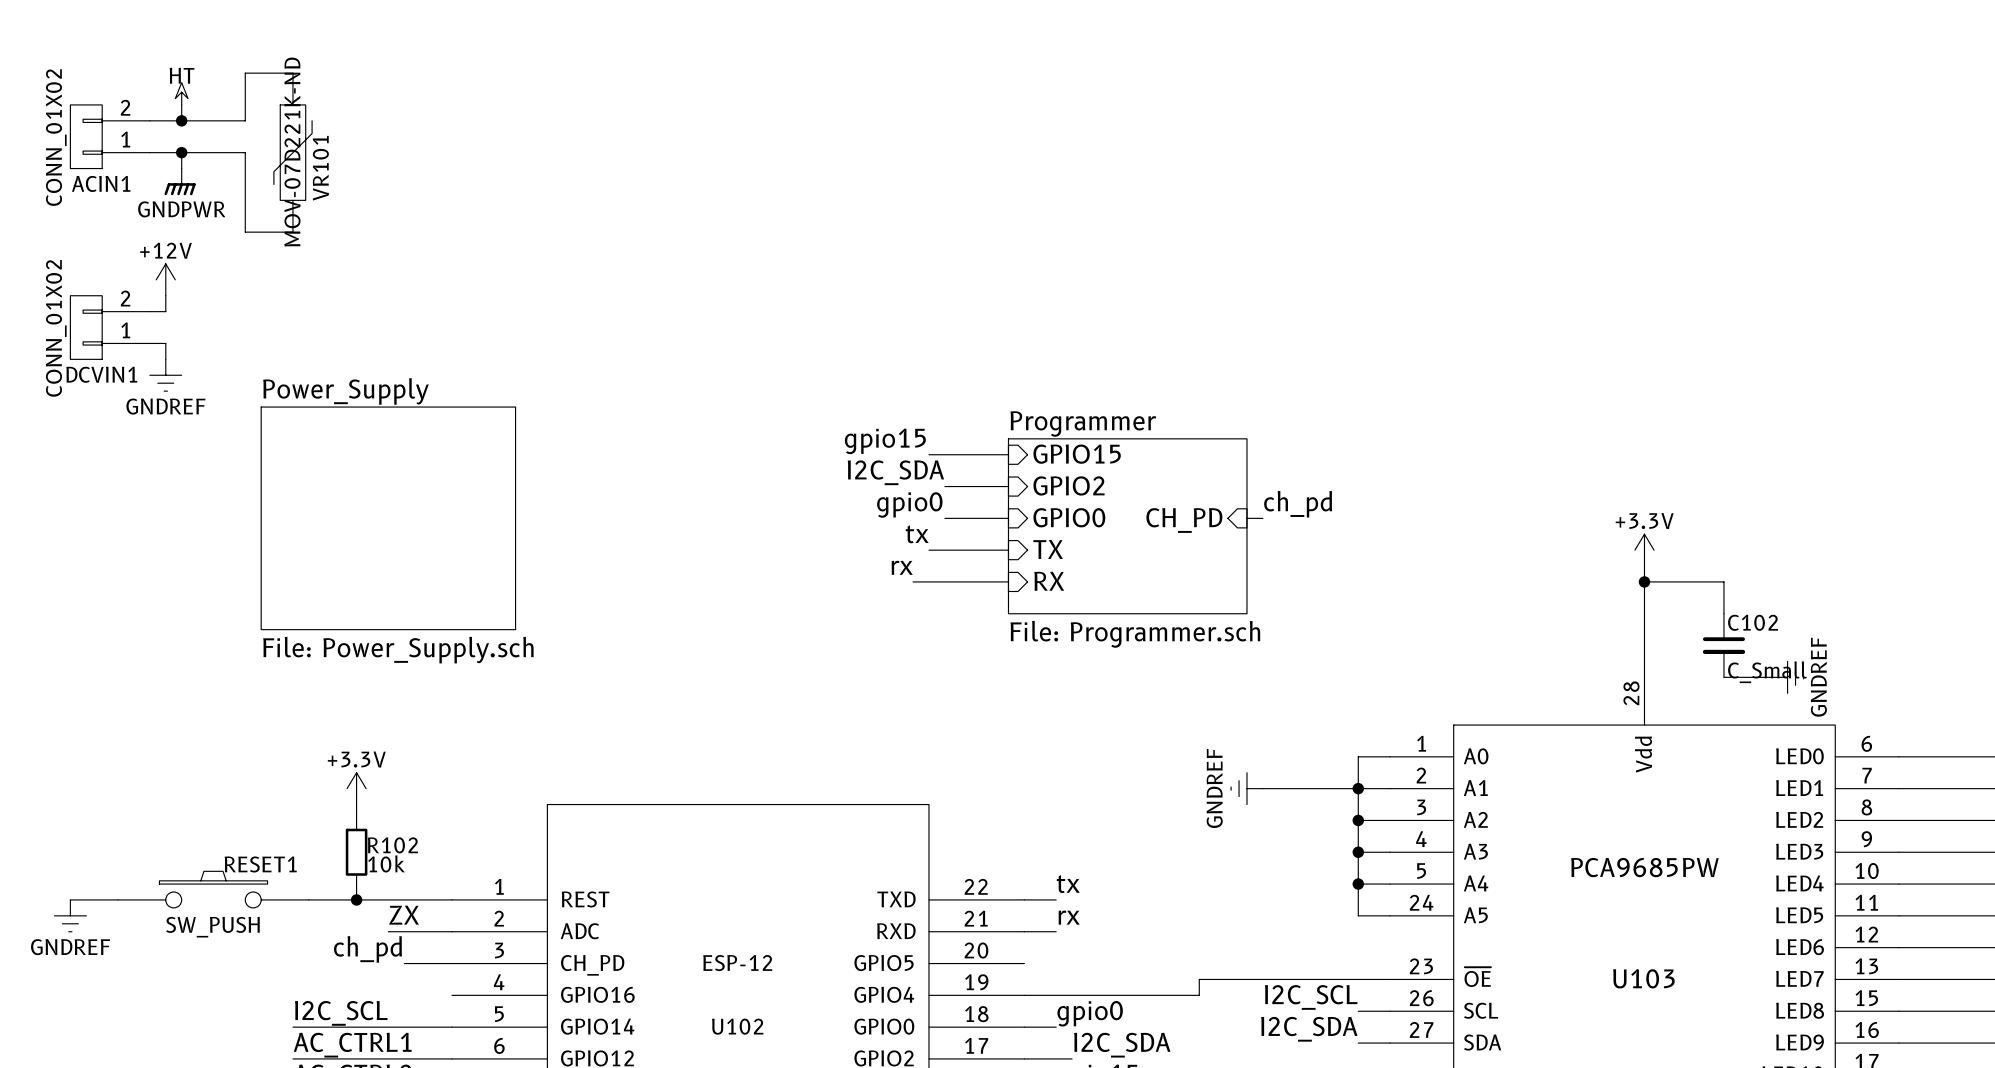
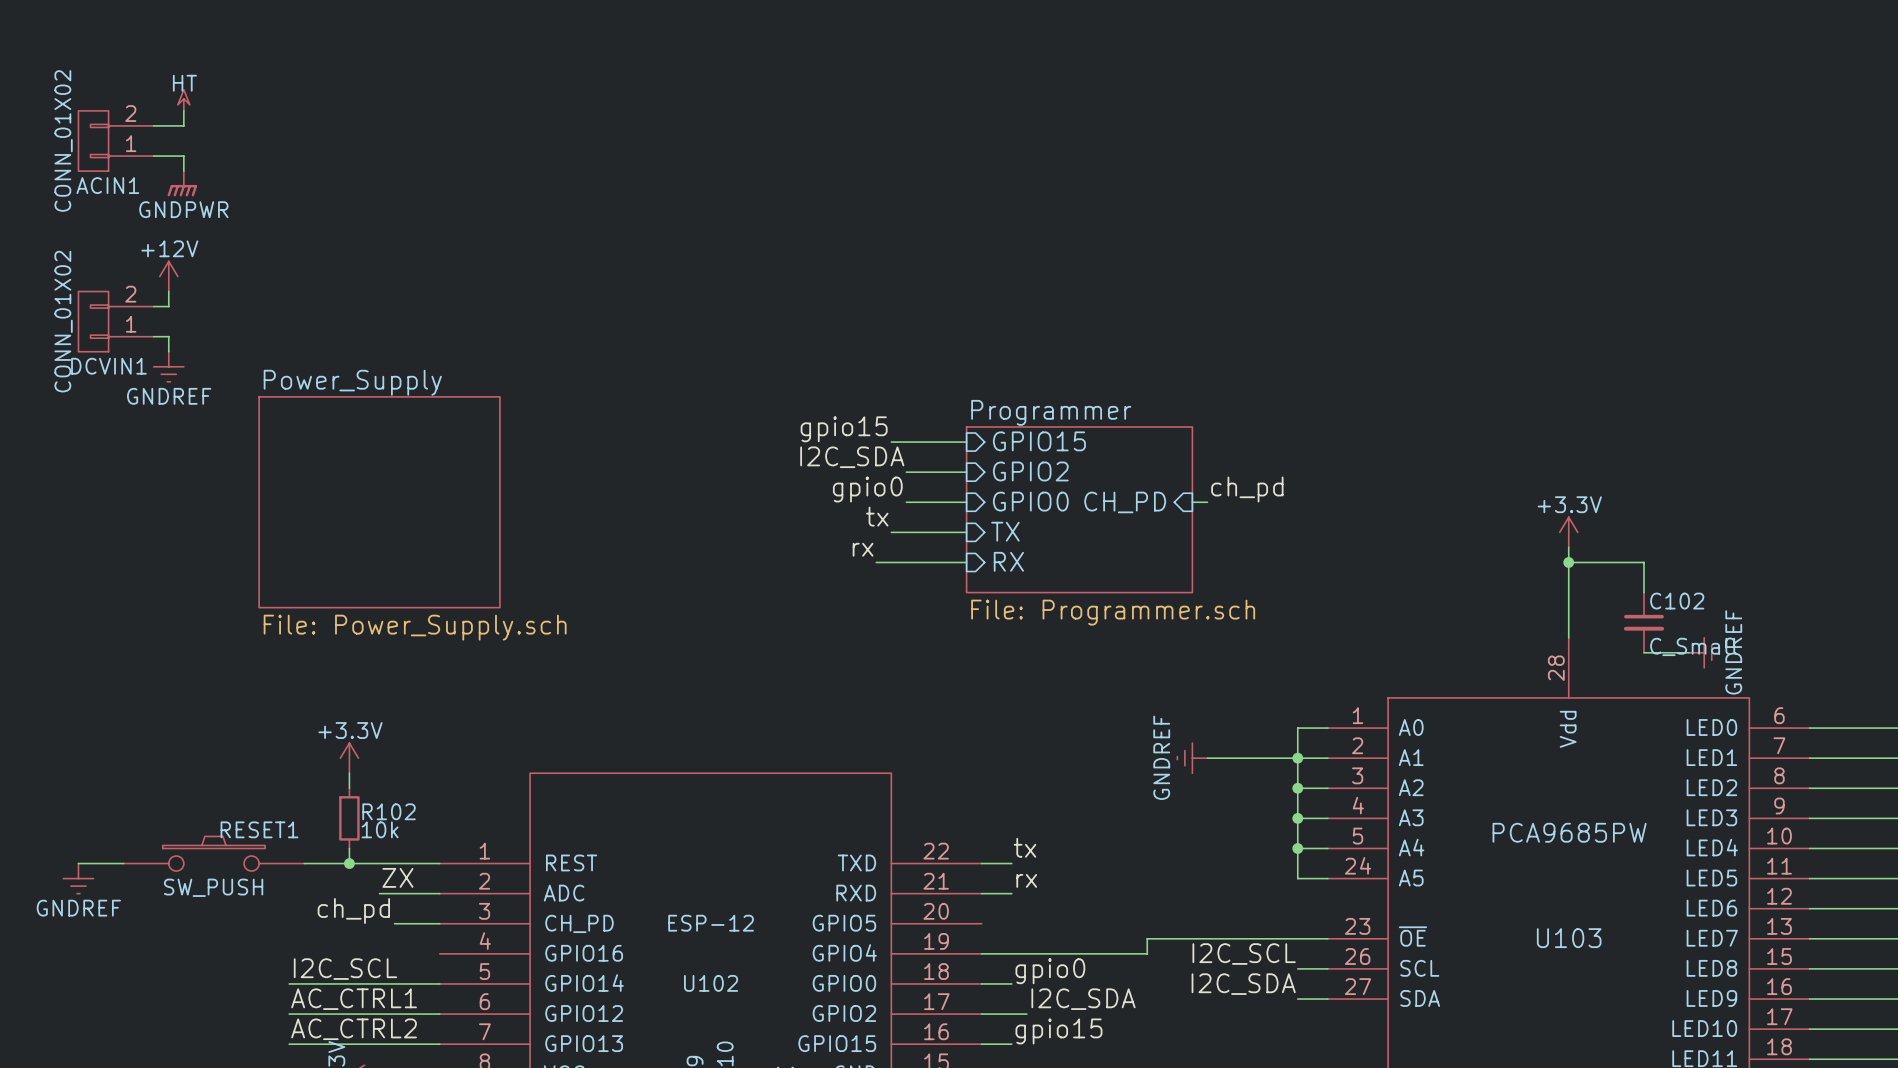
wire: (292, 73) (245, 73) (245, 120) (181, 120) -> none
junction: (181, 120) -> none
wire: (181, 152) (245, 152) (245, 232) (292, 232) -> none
junction: (181, 152) -> none
VR101: MOV-07D221K-ND (292, 152) -> none

